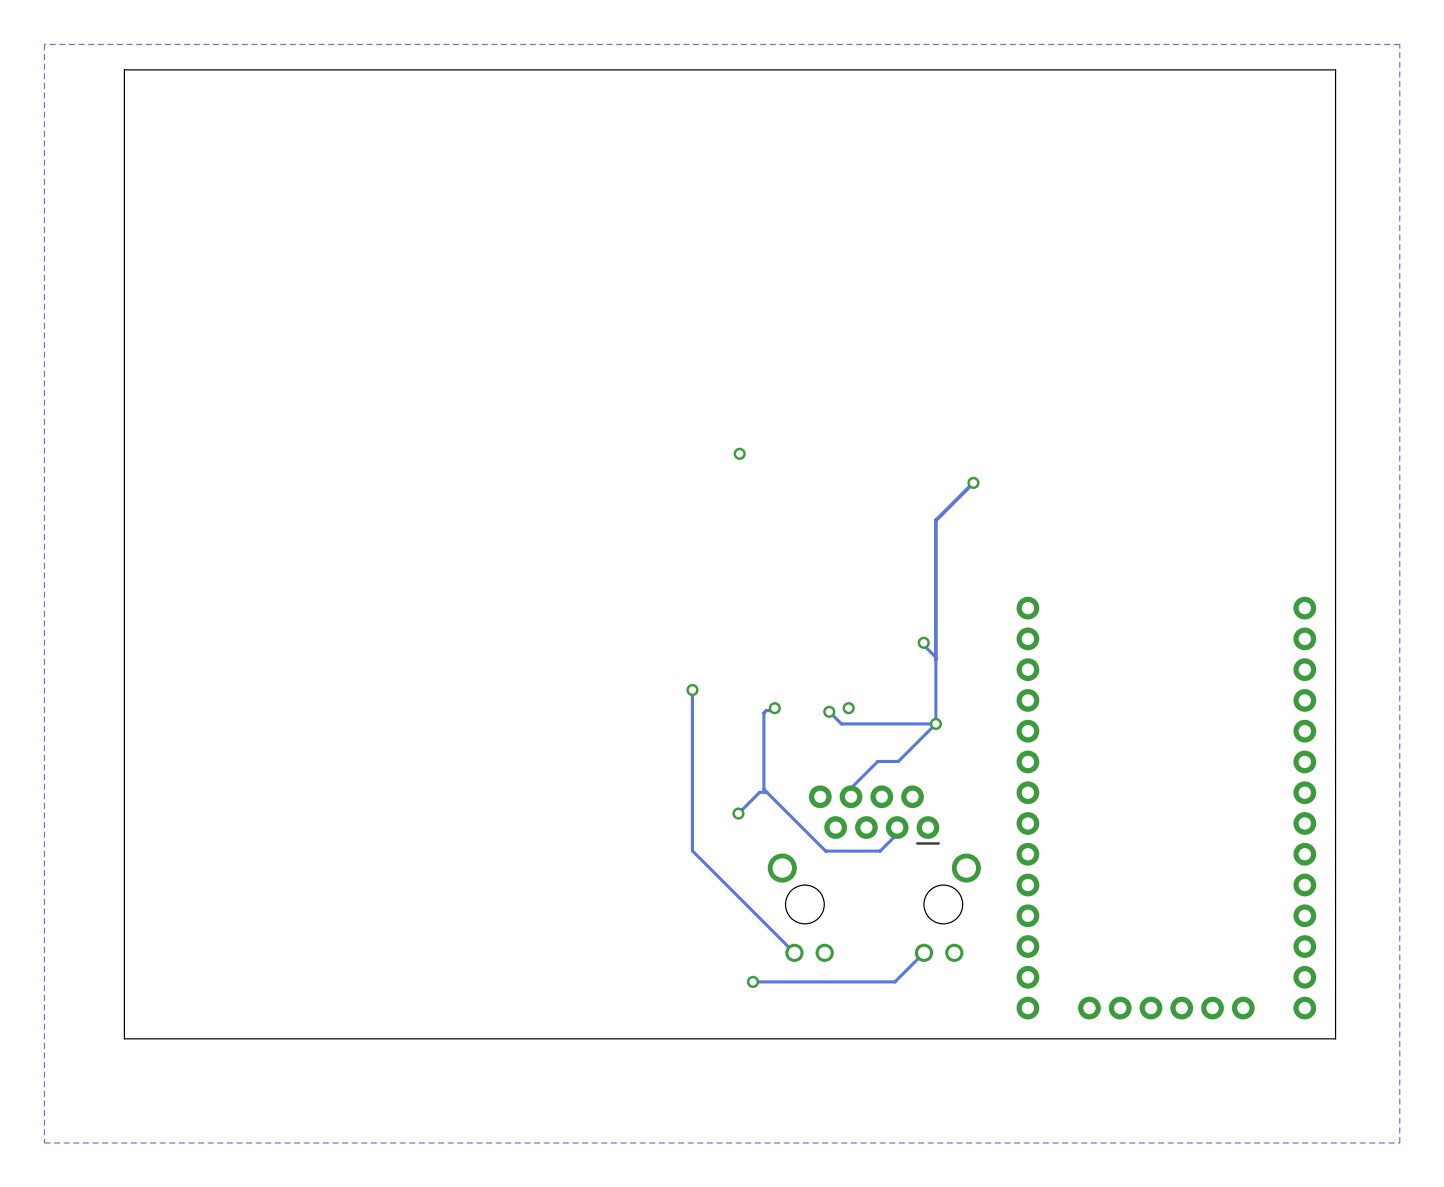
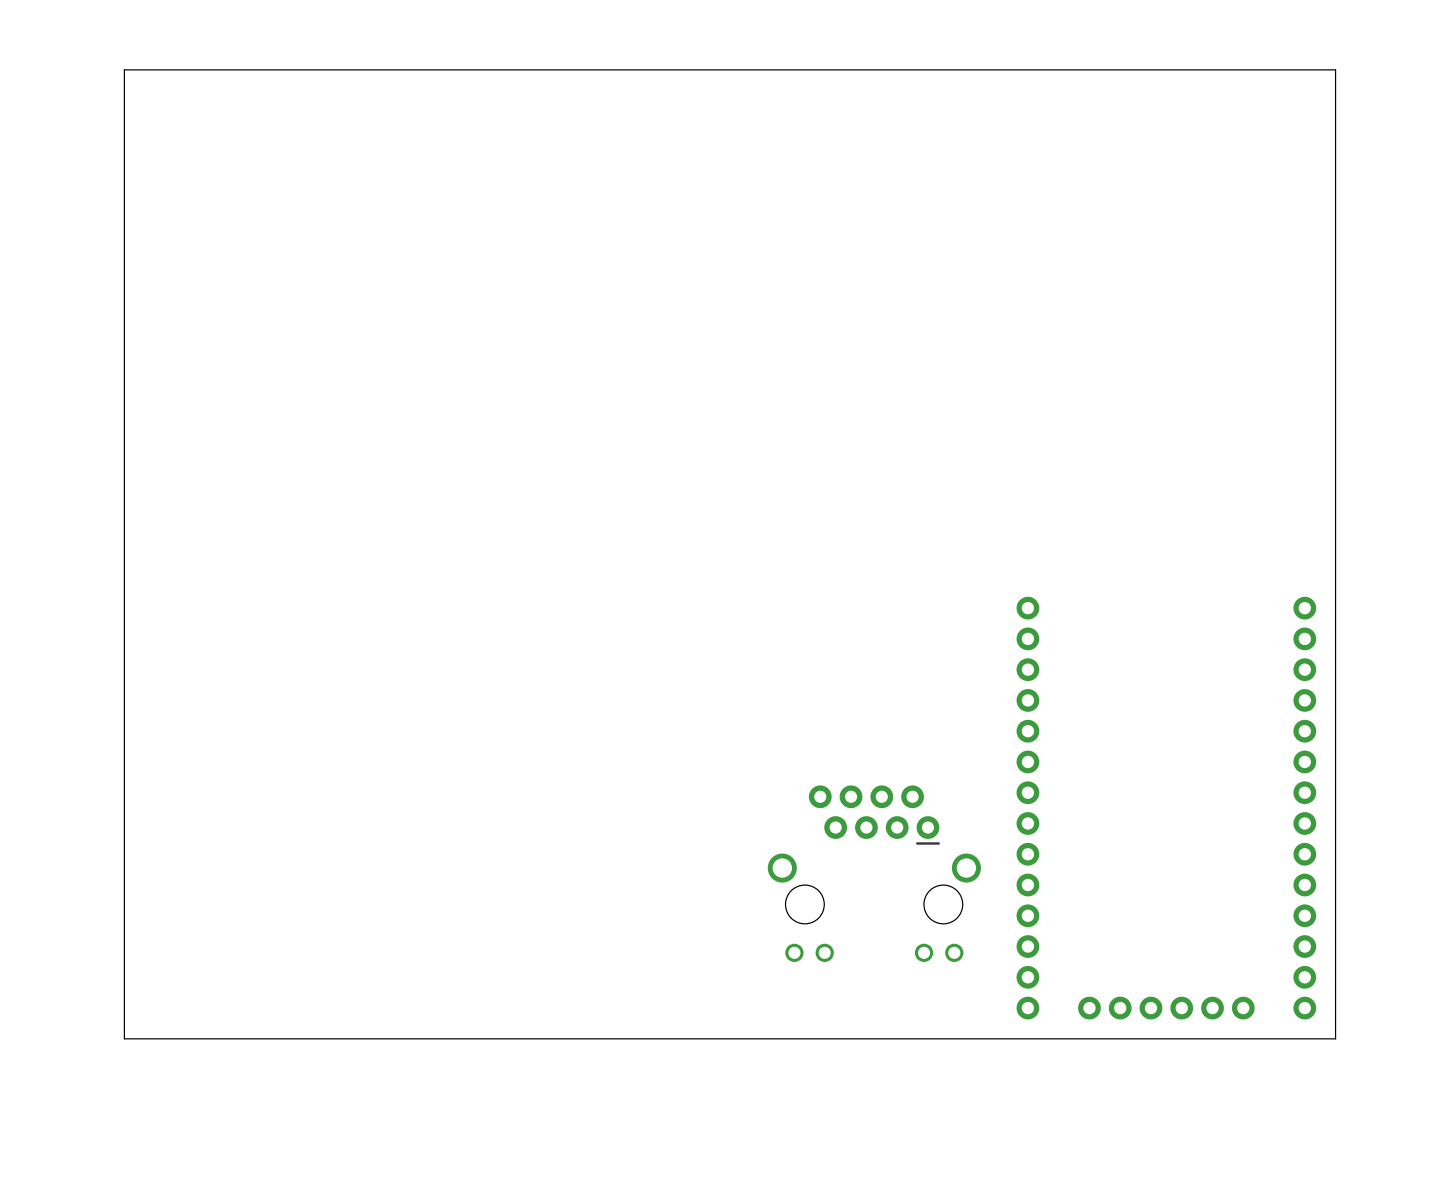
zone outline: (1399, 44) (44, 44) (44, 1142) (1399, 1142) (1399, 44) -> none
via: (739, 453) -> none
track: (973, 482) (935, 520) (935, 659) -> none
via: (973, 482) -> none
track: (923, 642) (935, 657) (935, 723) -> none
via: (923, 642) -> none
track: (692, 690) (692, 850) (794, 952) -> none
via: (692, 690) -> none
track: (774, 708) (763, 713) (763, 789) (825, 851) (880, 851) (897, 834) (897, 827) -> none
via: (774, 708) -> none
via: (848, 708) -> none
track: (829, 711) (841, 723) (935, 723) -> none
via: (829, 711) -> none
track: (935, 723) (898, 761) (877, 761) (851, 788) (851, 796) -> none
via: (935, 723) -> none
track: (766, 792) (759, 792) (738, 813) -> none
via: (738, 813) -> none
track: (924, 952) (894, 981) (752, 981) -> none
via: (752, 981) -> none

